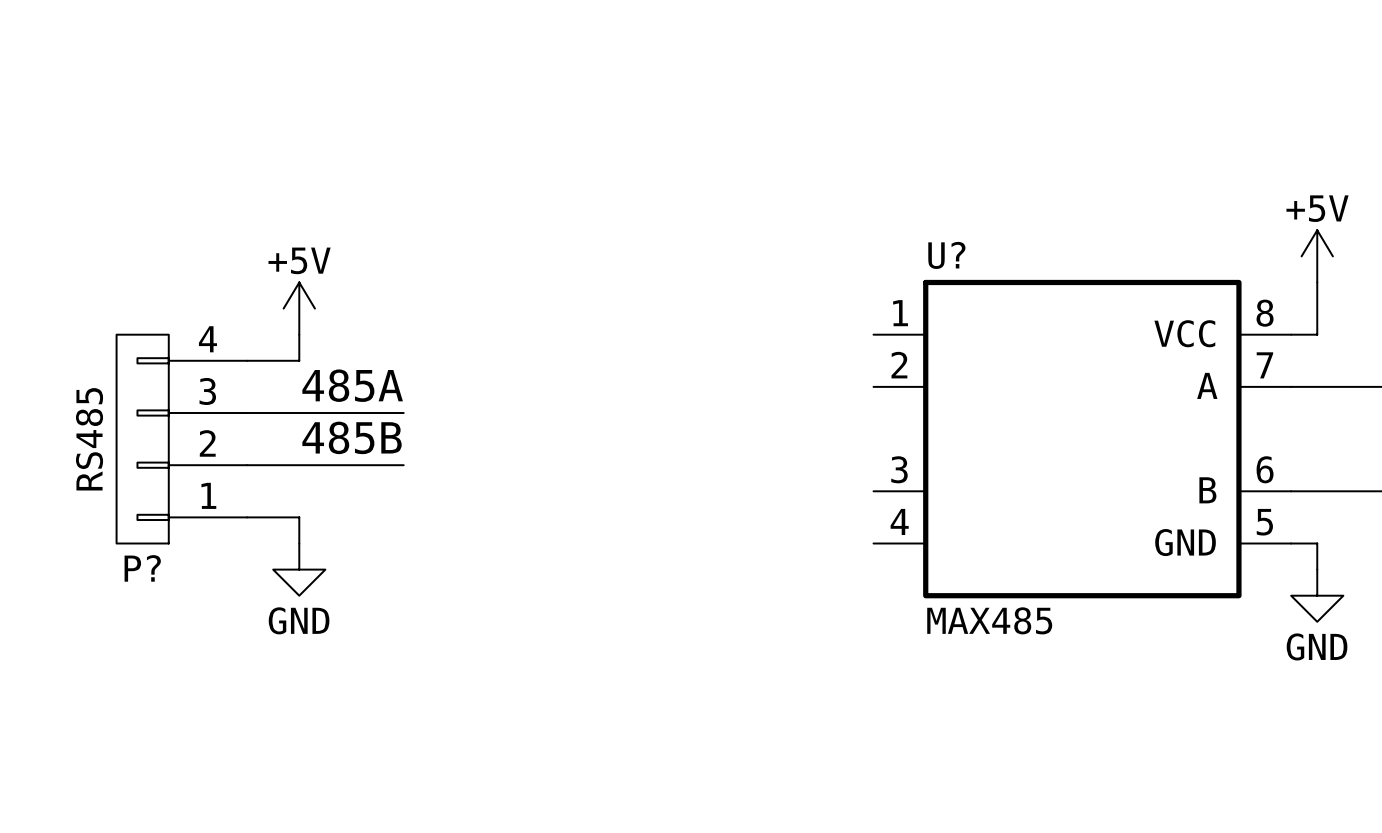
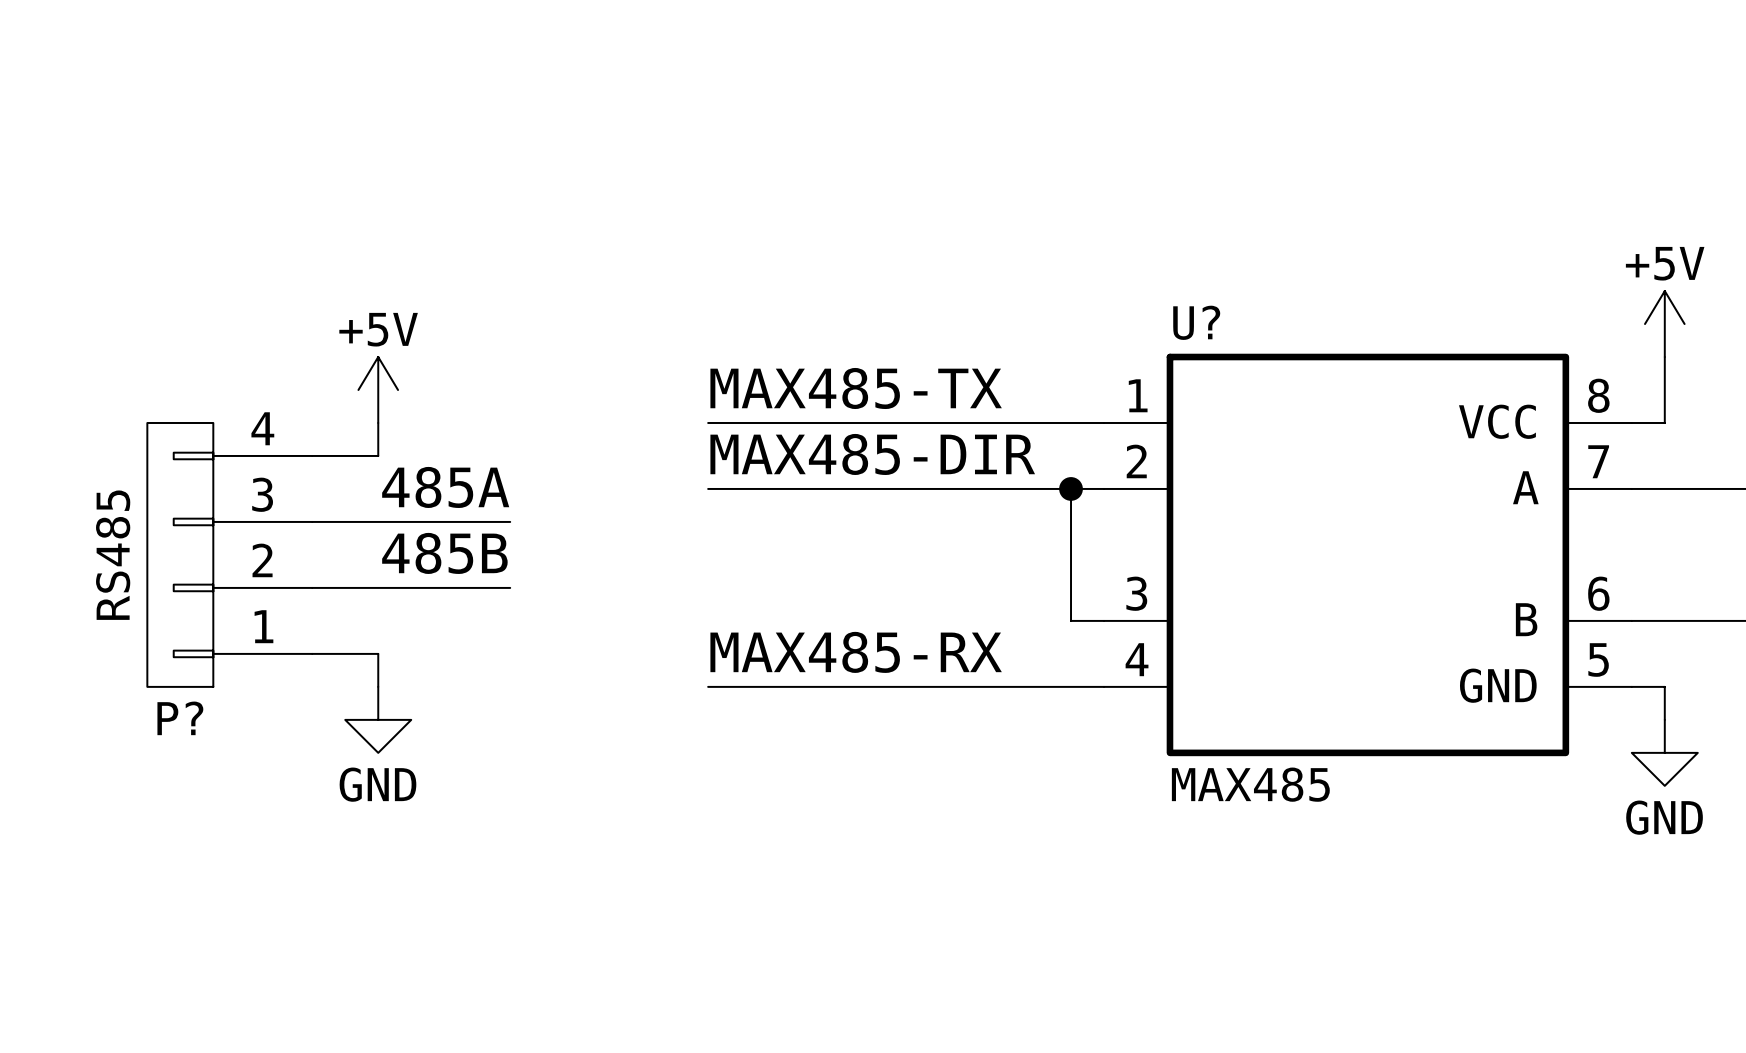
label: none -> MAX485-TX (856, 388)
wire: none -> (708, 422) (1104, 422)
label: none -> MAX485-DIR (872, 454)
wire: none -> (708, 488) (1104, 488)
wire: none -> (1071, 488) (1071, 620) (1104, 620)
junction: none -> (1071, 488)
label: none -> MAX485-RX (856, 652)
wire: none -> (708, 686) (1104, 686)

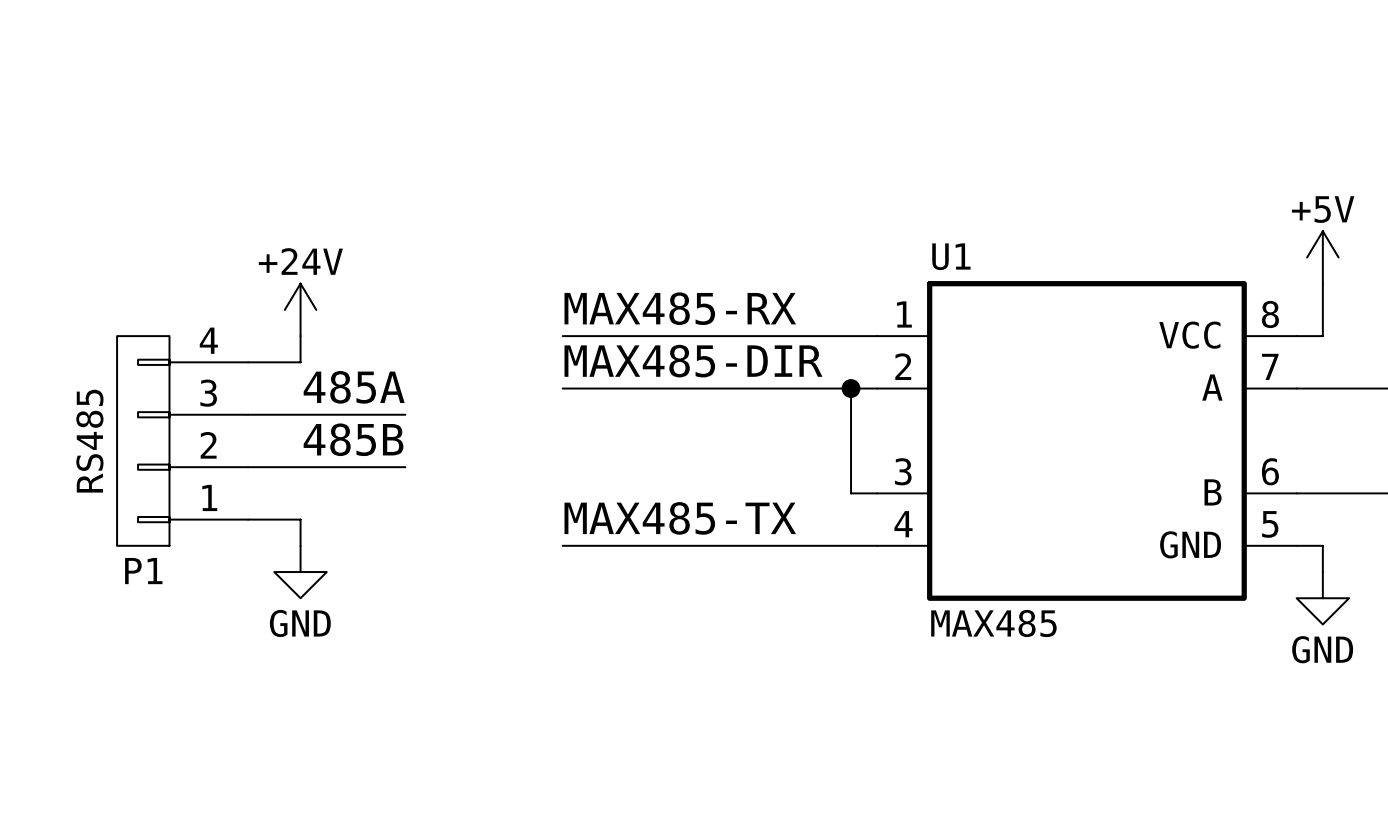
U? name: U? (1196, 322) -> U1 (951, 256)
label: MAX485-TX (856, 388) -> MAX485-RX (680, 308)
power symbol: +5V (378, 390) -> +24V (300, 309)
label: MAX485-RX (856, 652) -> MAX485-TX (680, 518)
P? name: P? (180, 718) -> P1 (143, 571)

